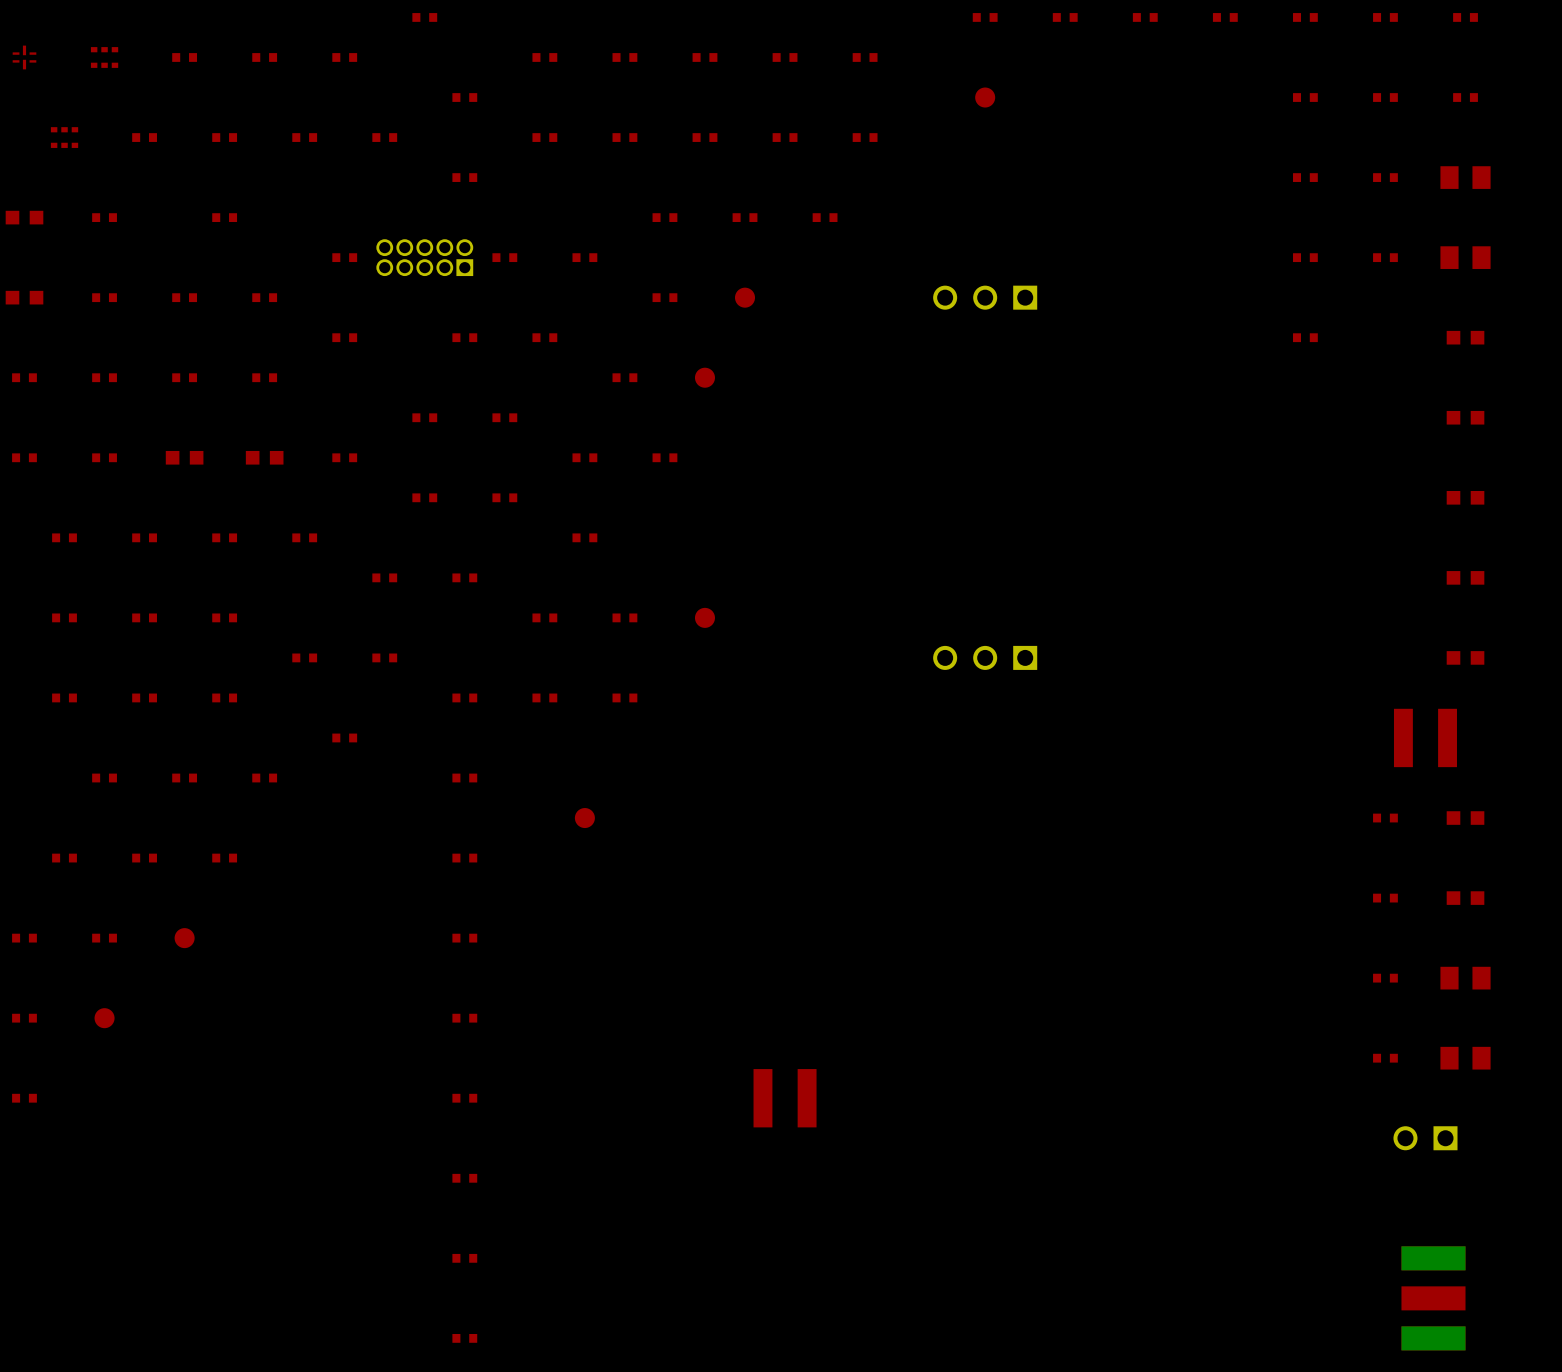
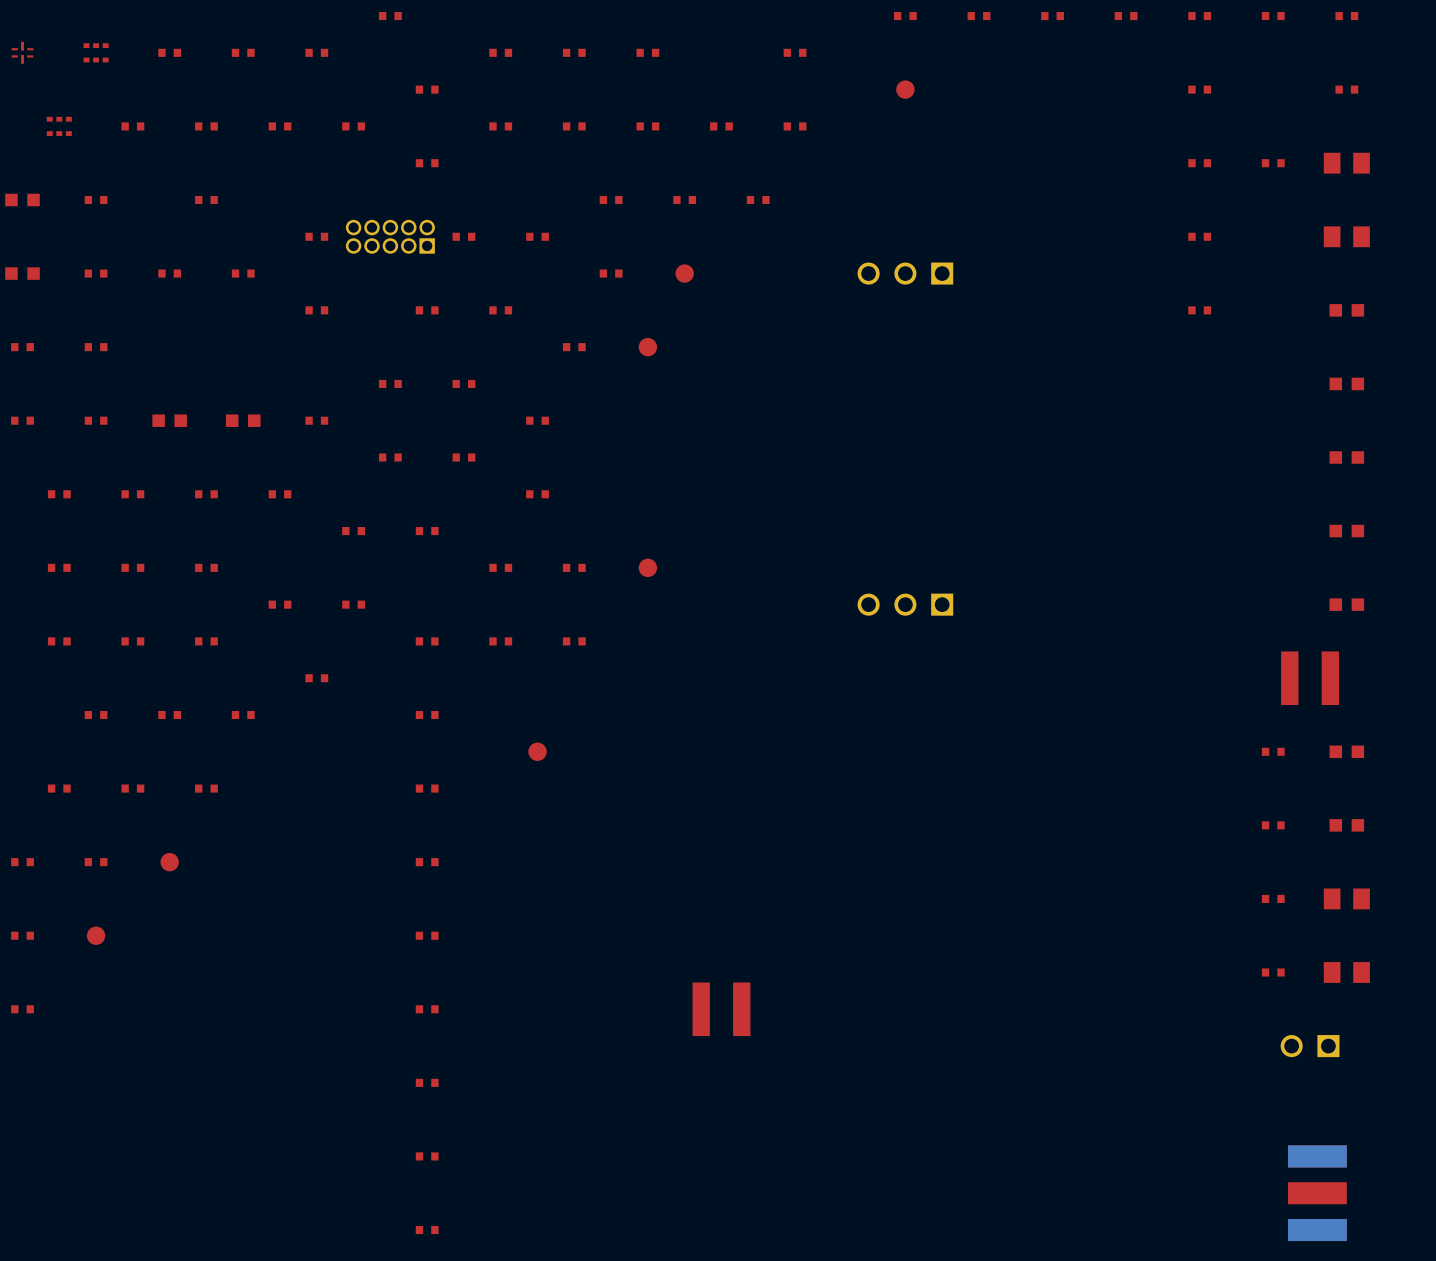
part: (785, 57) -> none
part: (1385, 97) -> none
part: (1385, 257) -> none
part: (184, 377) -> none
part: (264, 377) -> none
part: (664, 457) -> none

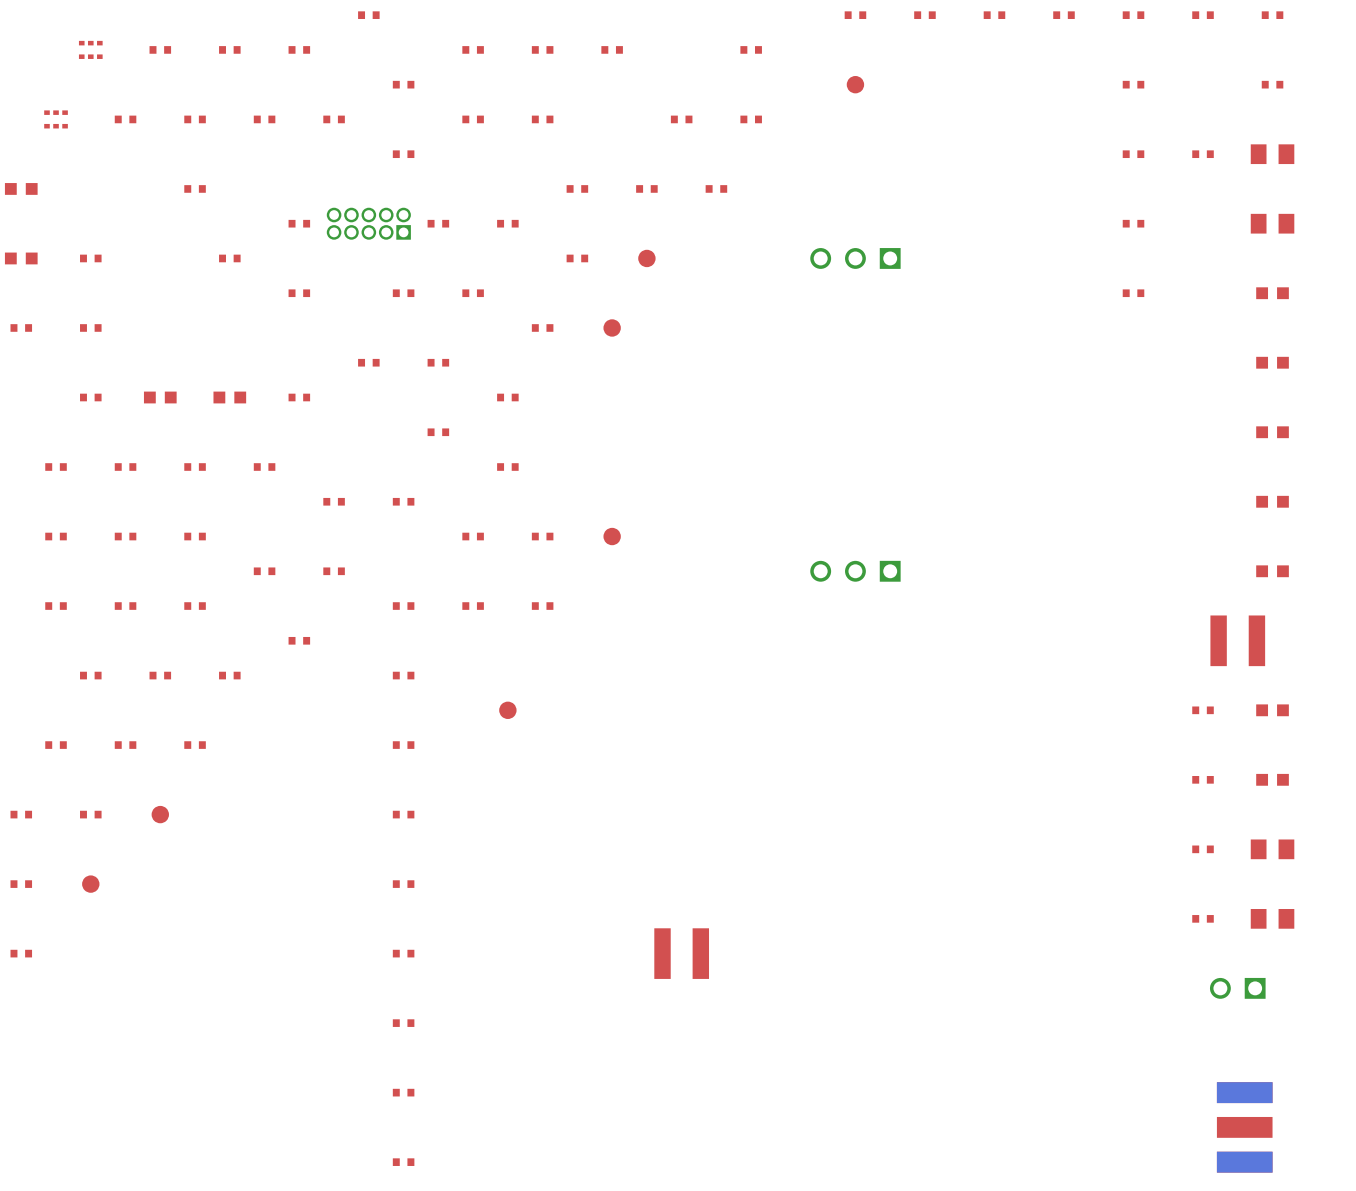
part: (22, 52) -> none
part: (647, 126) -> none
part: (96, 199) -> none
part: (169, 273) -> none
part: (22, 420) -> none
part: (390, 457) -> none

